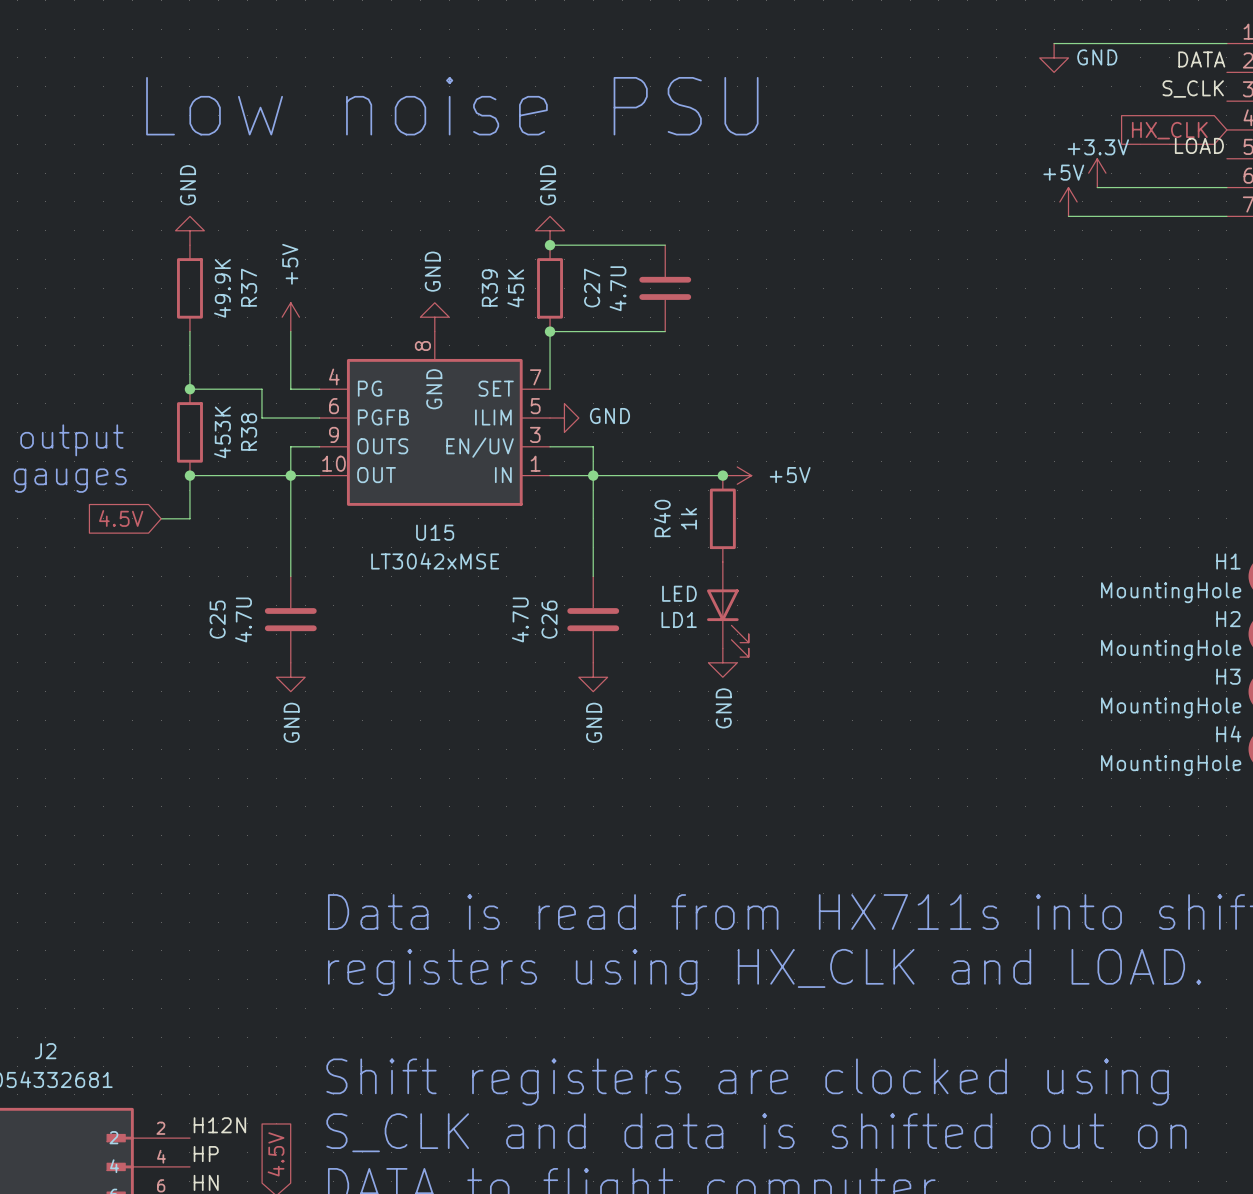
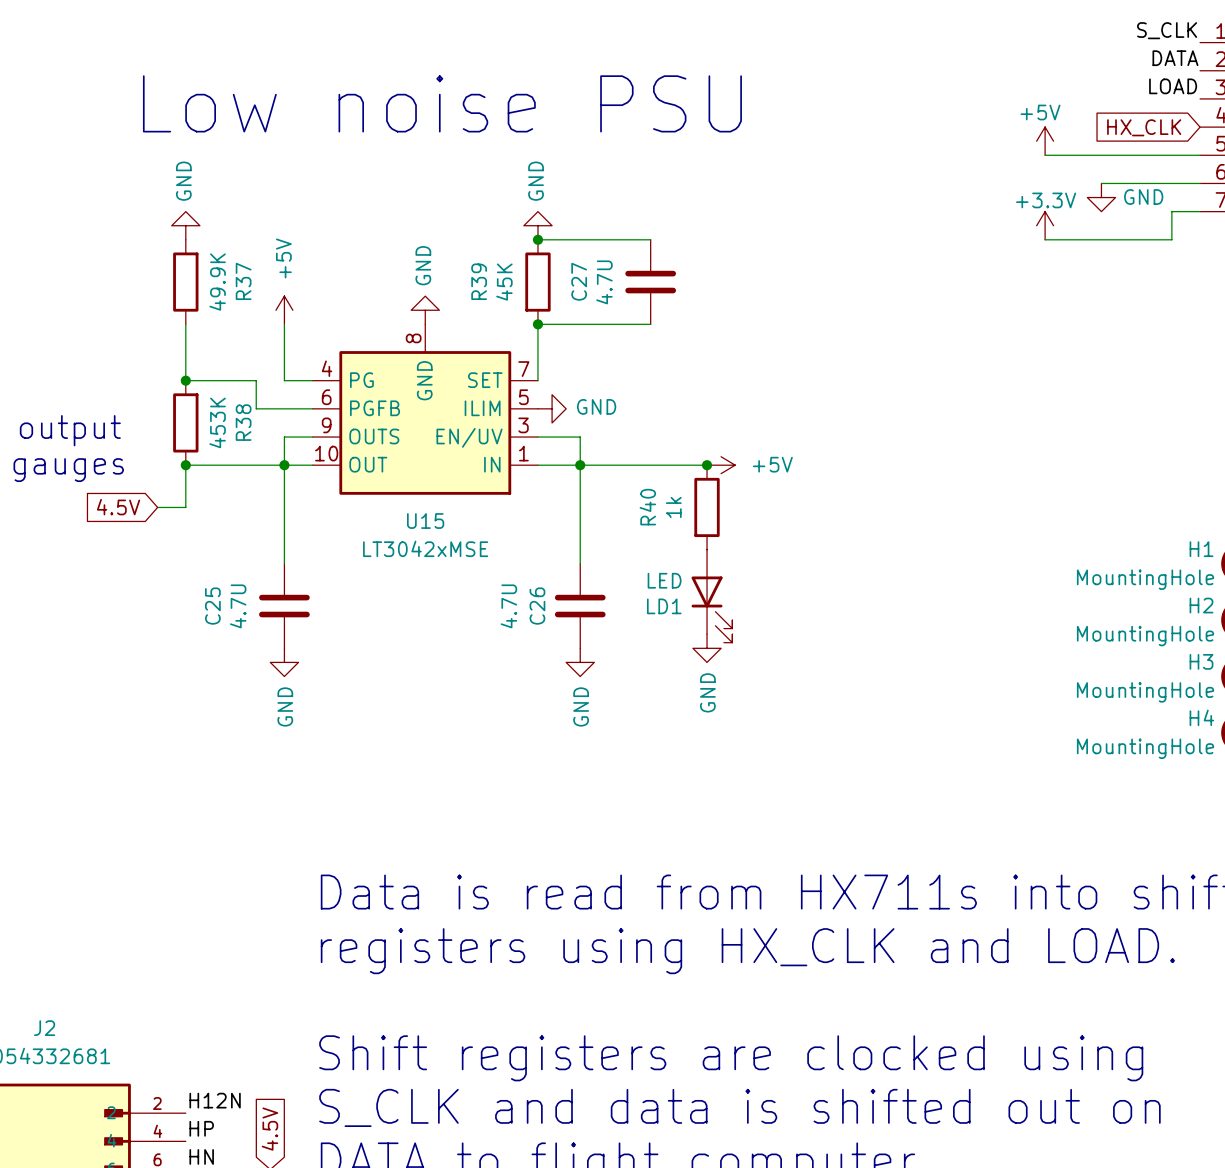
label: none -> S_CLK (1167, 30)
wire: (1054, 43) (1226, 43) -> none
power symbol position: GND (1054, 57) -> GND (1101, 197)
label: S_CLK (1193, 88) -> LOAD (1173, 86)
label: LOAD (1199, 145) -> none
wire: none -> (1045, 155) (1200, 155)
power symbol position: +3.3V (1097, 173) -> +3.3V (1045, 225)
wire: (1097, 187) (1126, 187) -> none
power symbol position: +5V (1068, 201) -> +5V (1045, 141)
wire: (1068, 216) (1198, 216) -> (1045, 239) (1171, 239) (1171, 211)

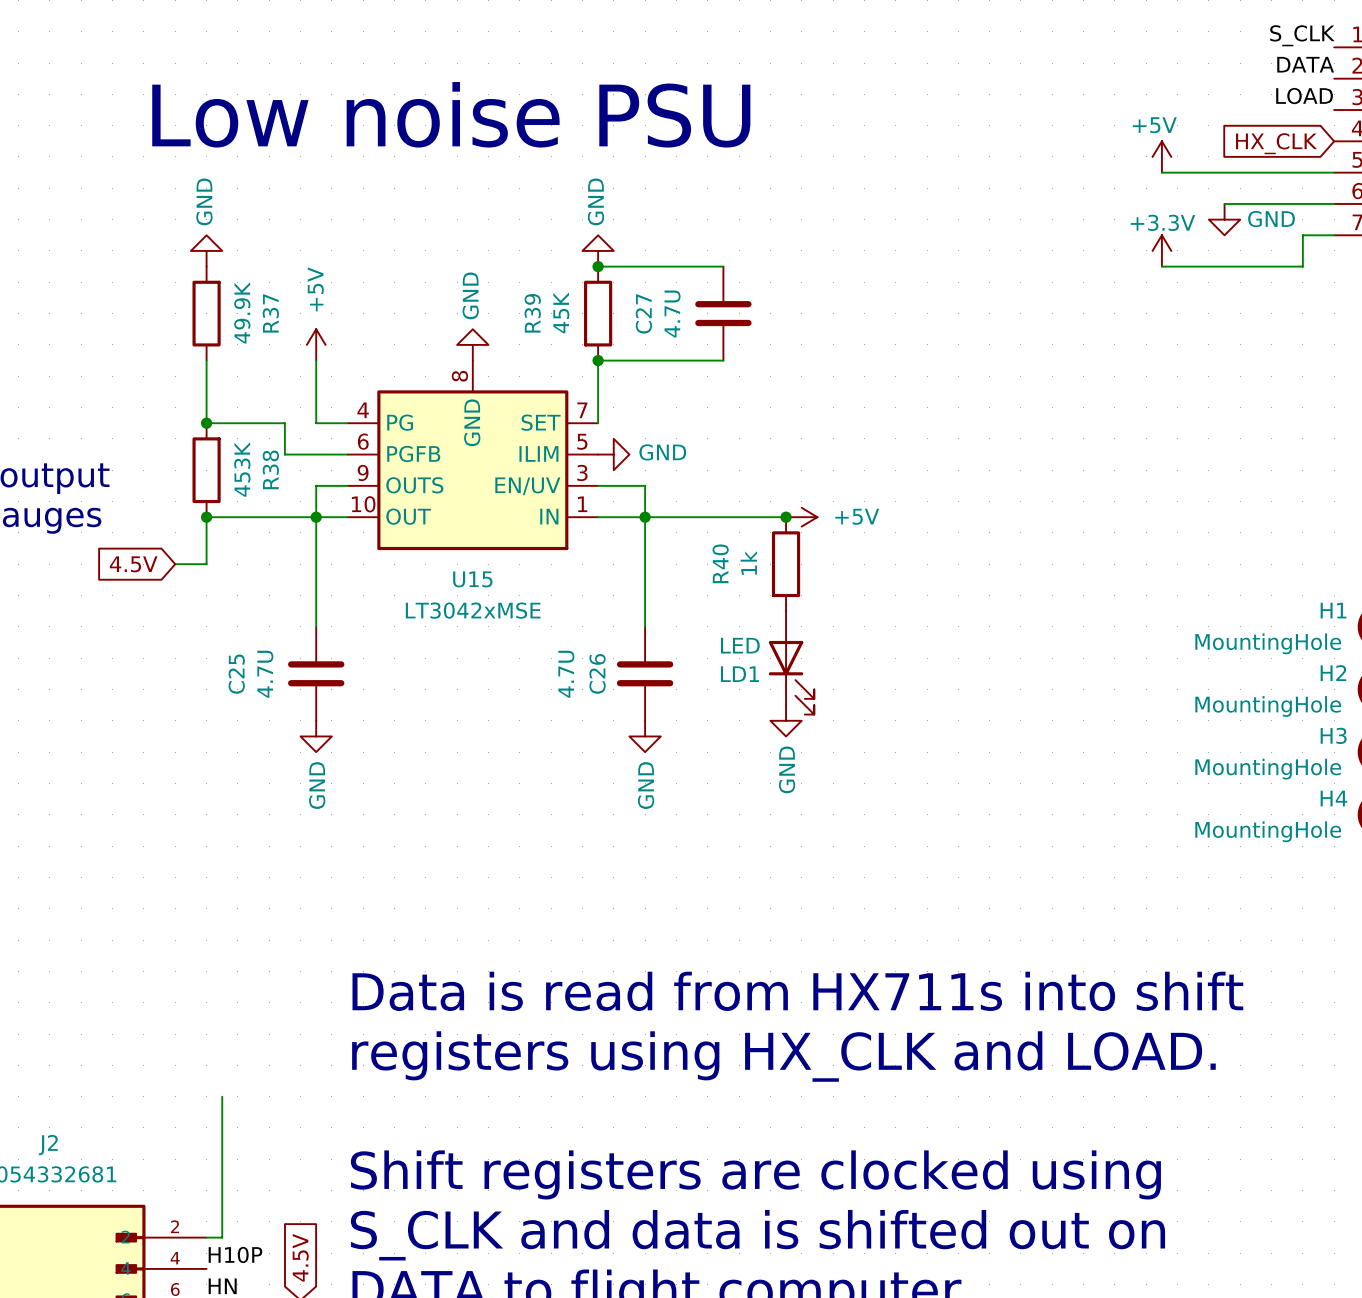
wire: none -> (222, 1096) (222, 1237) (206, 1237)
label: H12N (215, 1100) -> none
label: HP (201, 1128) -> H10P (235, 1254)

